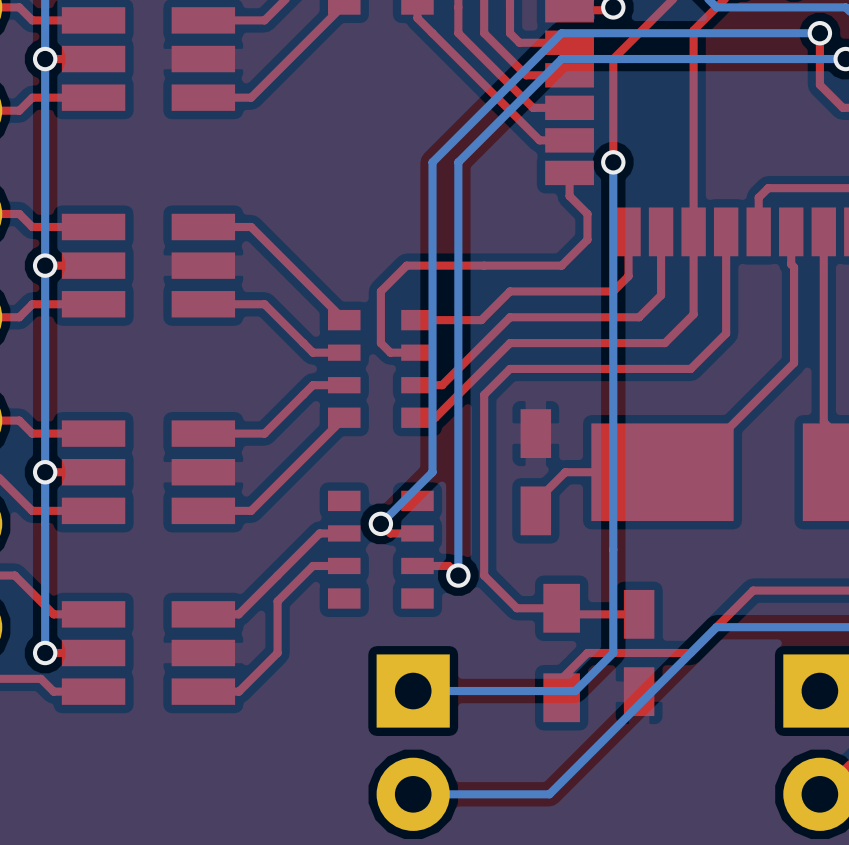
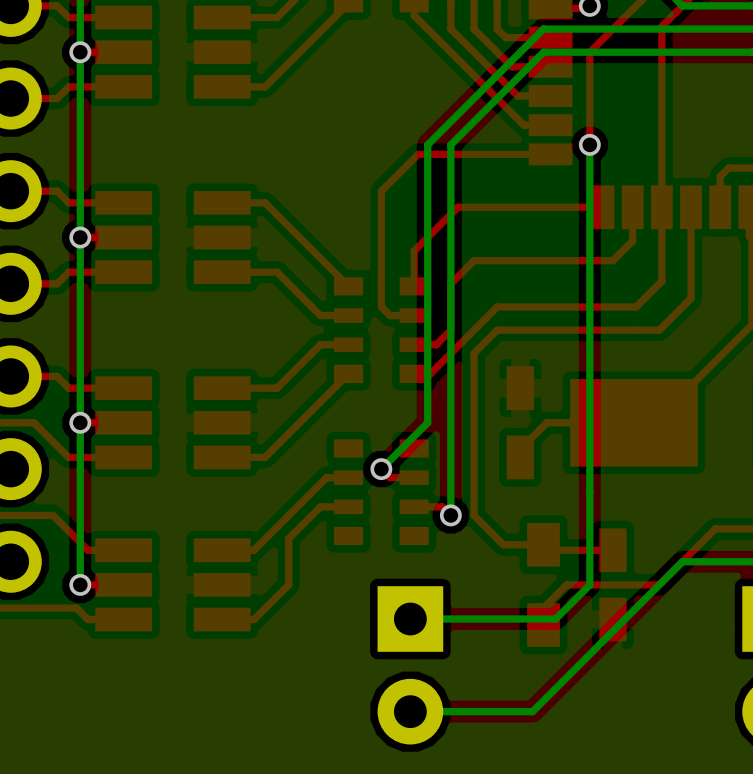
top track: (569, 172) (569, 196) (587, 213) (587, 239) (561, 265) (406, 265) (380, 291) -> (550, 154) (418, 154) (381, 191) (381, 260)
top track: (628, 231) (628, 276) (613, 291) -> (632, 240) (612, 260) (589, 260)
top track: none -> (603, 207) (457, 207) (414, 251) (414, 286)
top track: (661, 269) (661, 295) (639, 317) (510, 317) (458, 368) -> none
top track: (510, 291) (481, 320) (417, 320) -> (497, 260) (474, 260) (450, 283) (450, 330)

